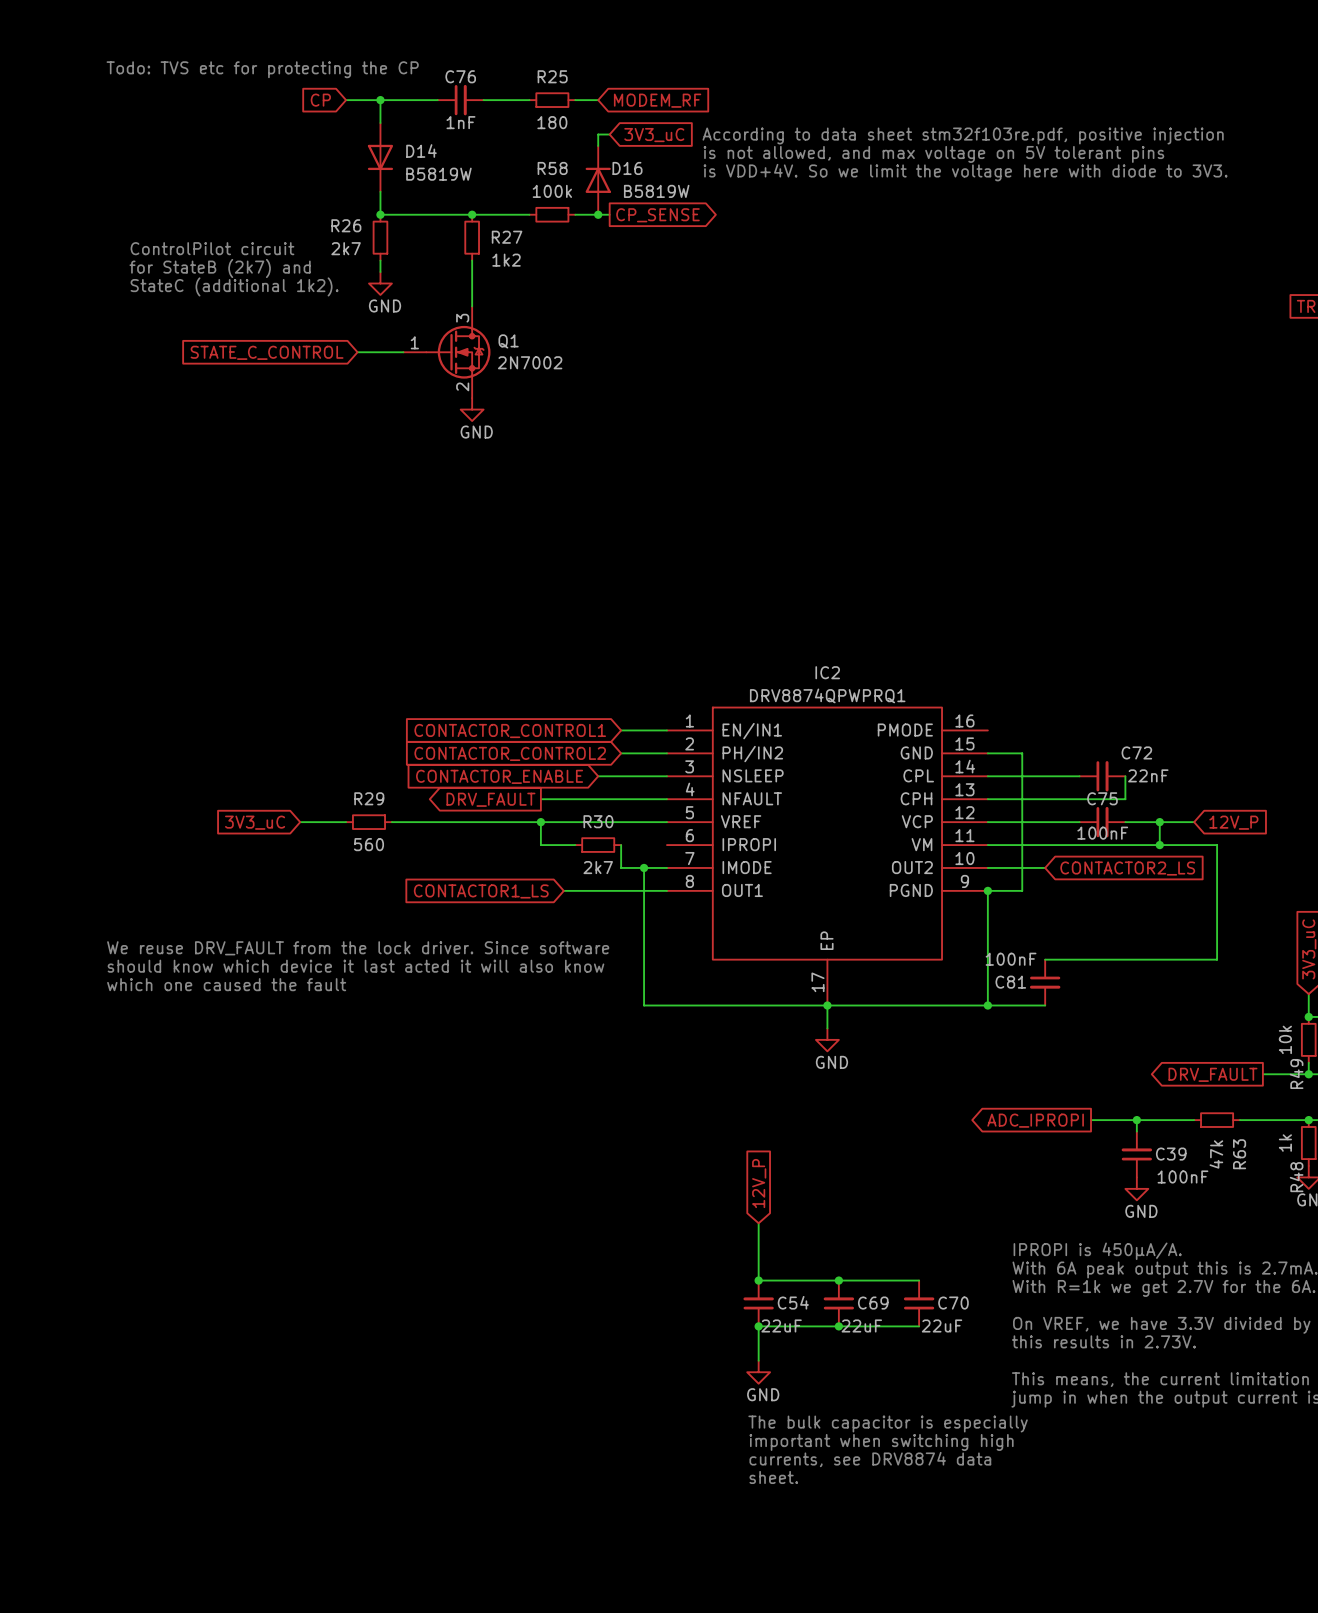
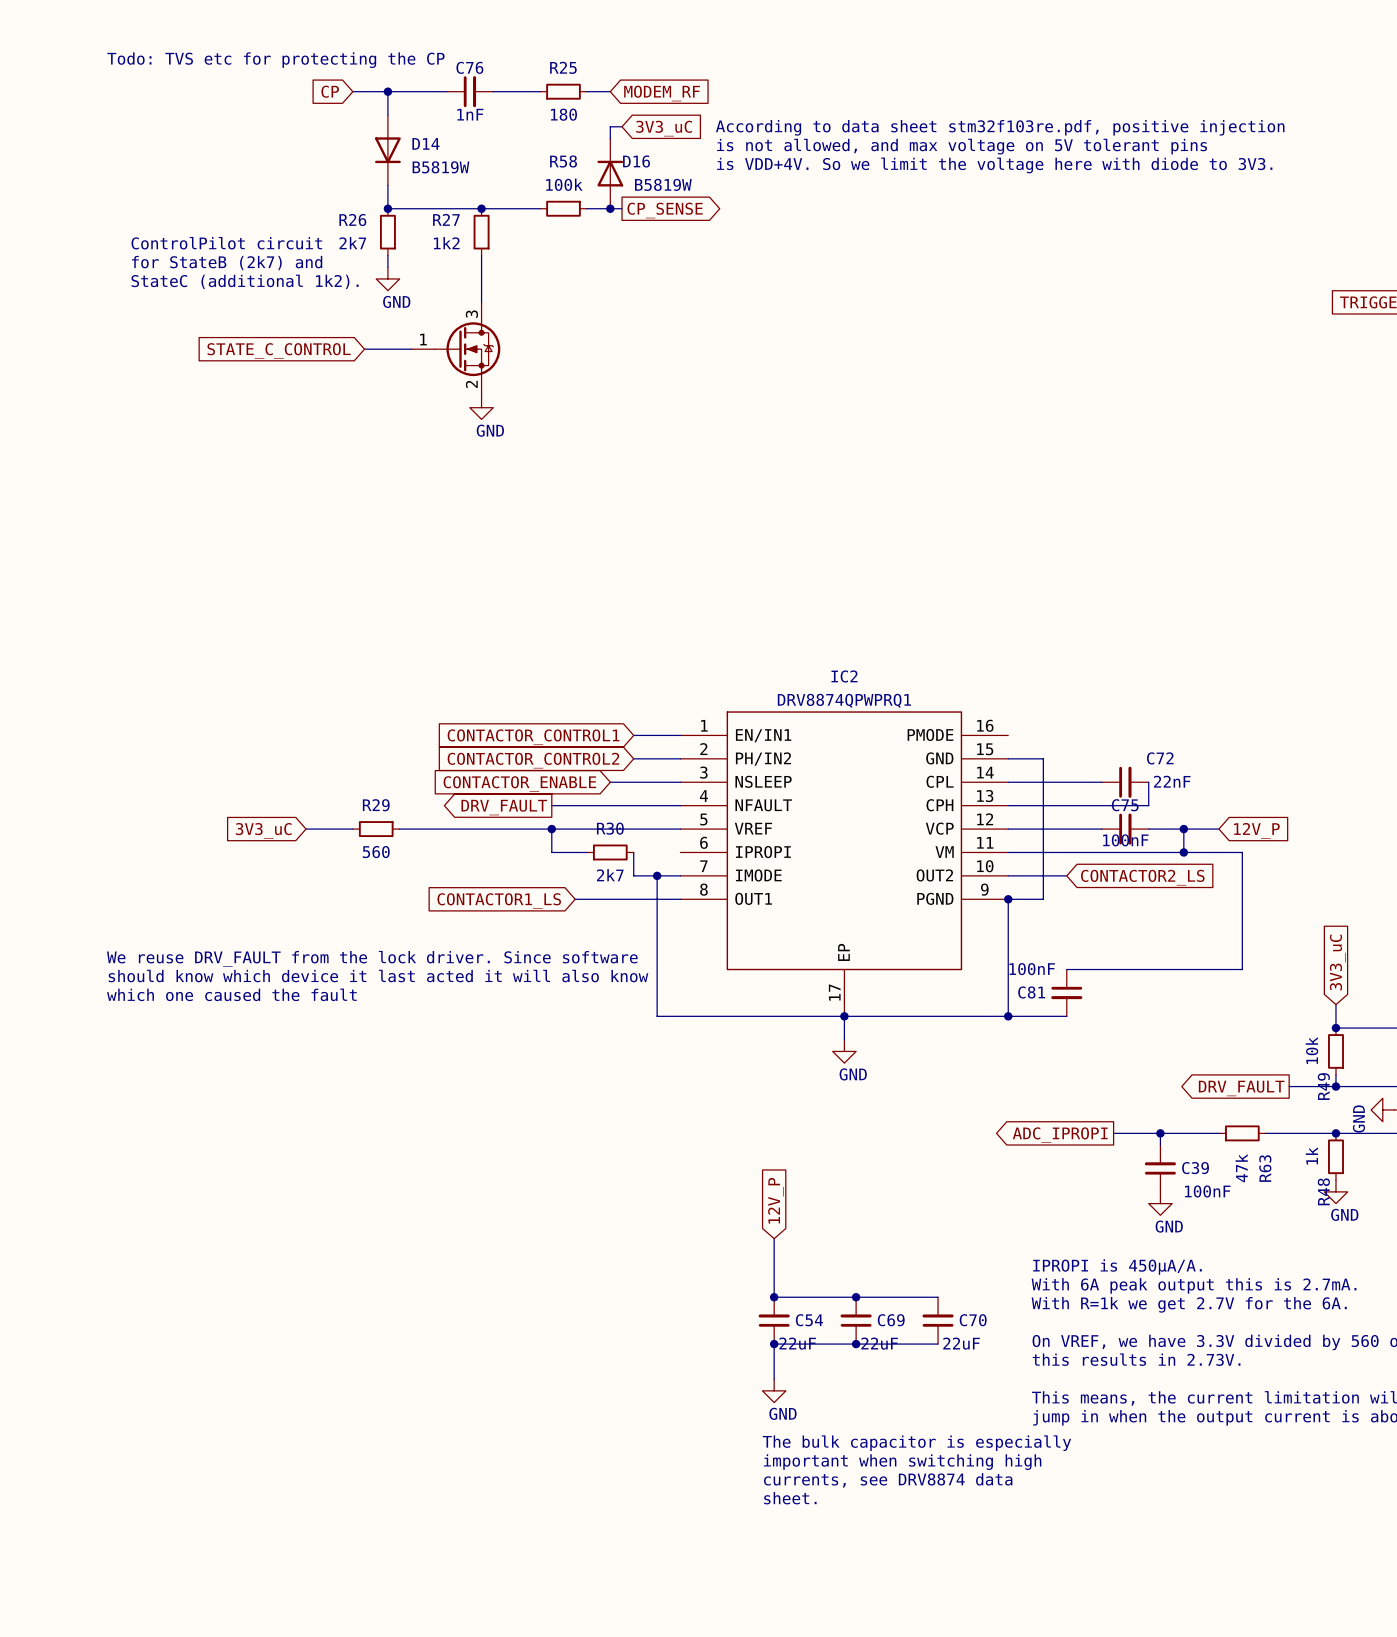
R27 name position: R27 (507, 237) -> R27 (446, 219)
R27 value position: 1k2 (506, 260) -> 1k2 (446, 243)
Q1 name: Q1 (508, 341) -> none
Q1 value: 2N7002 (530, 362) -> none

